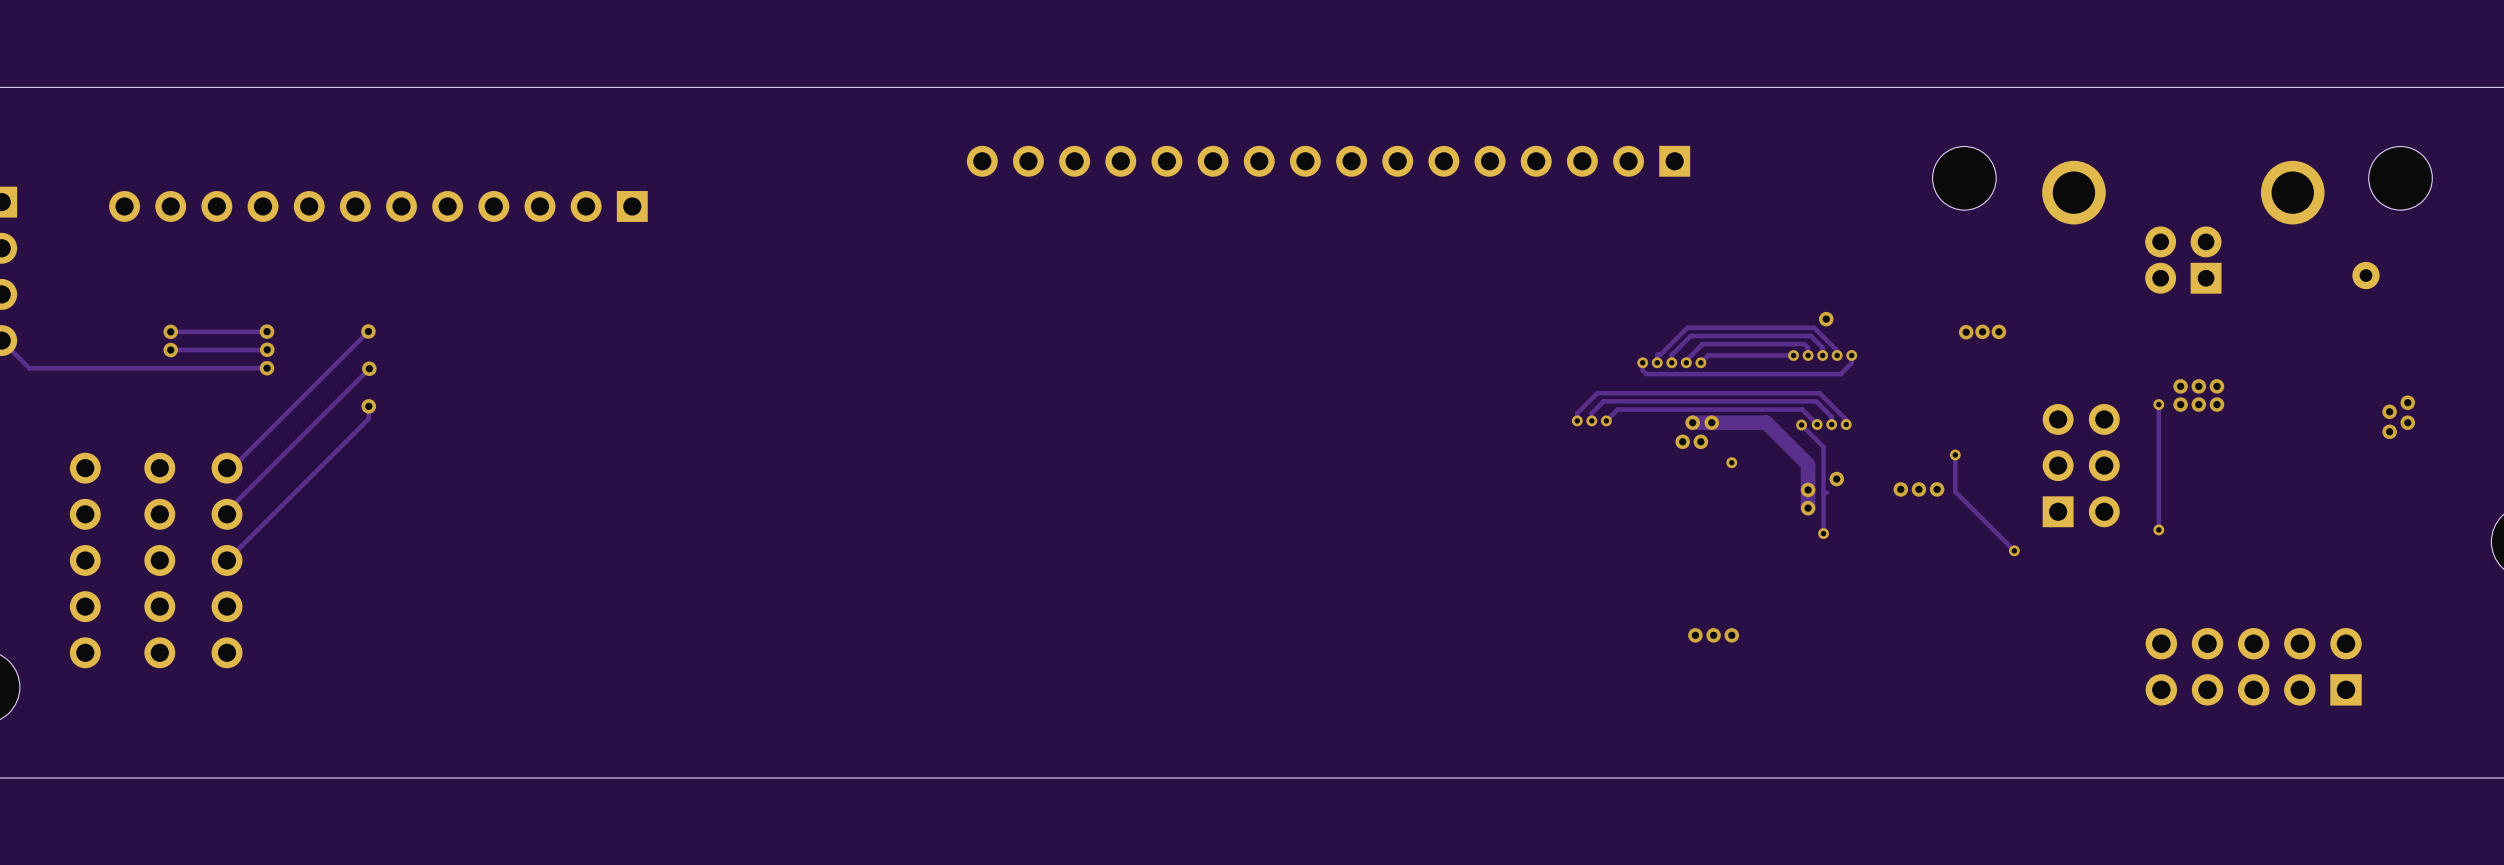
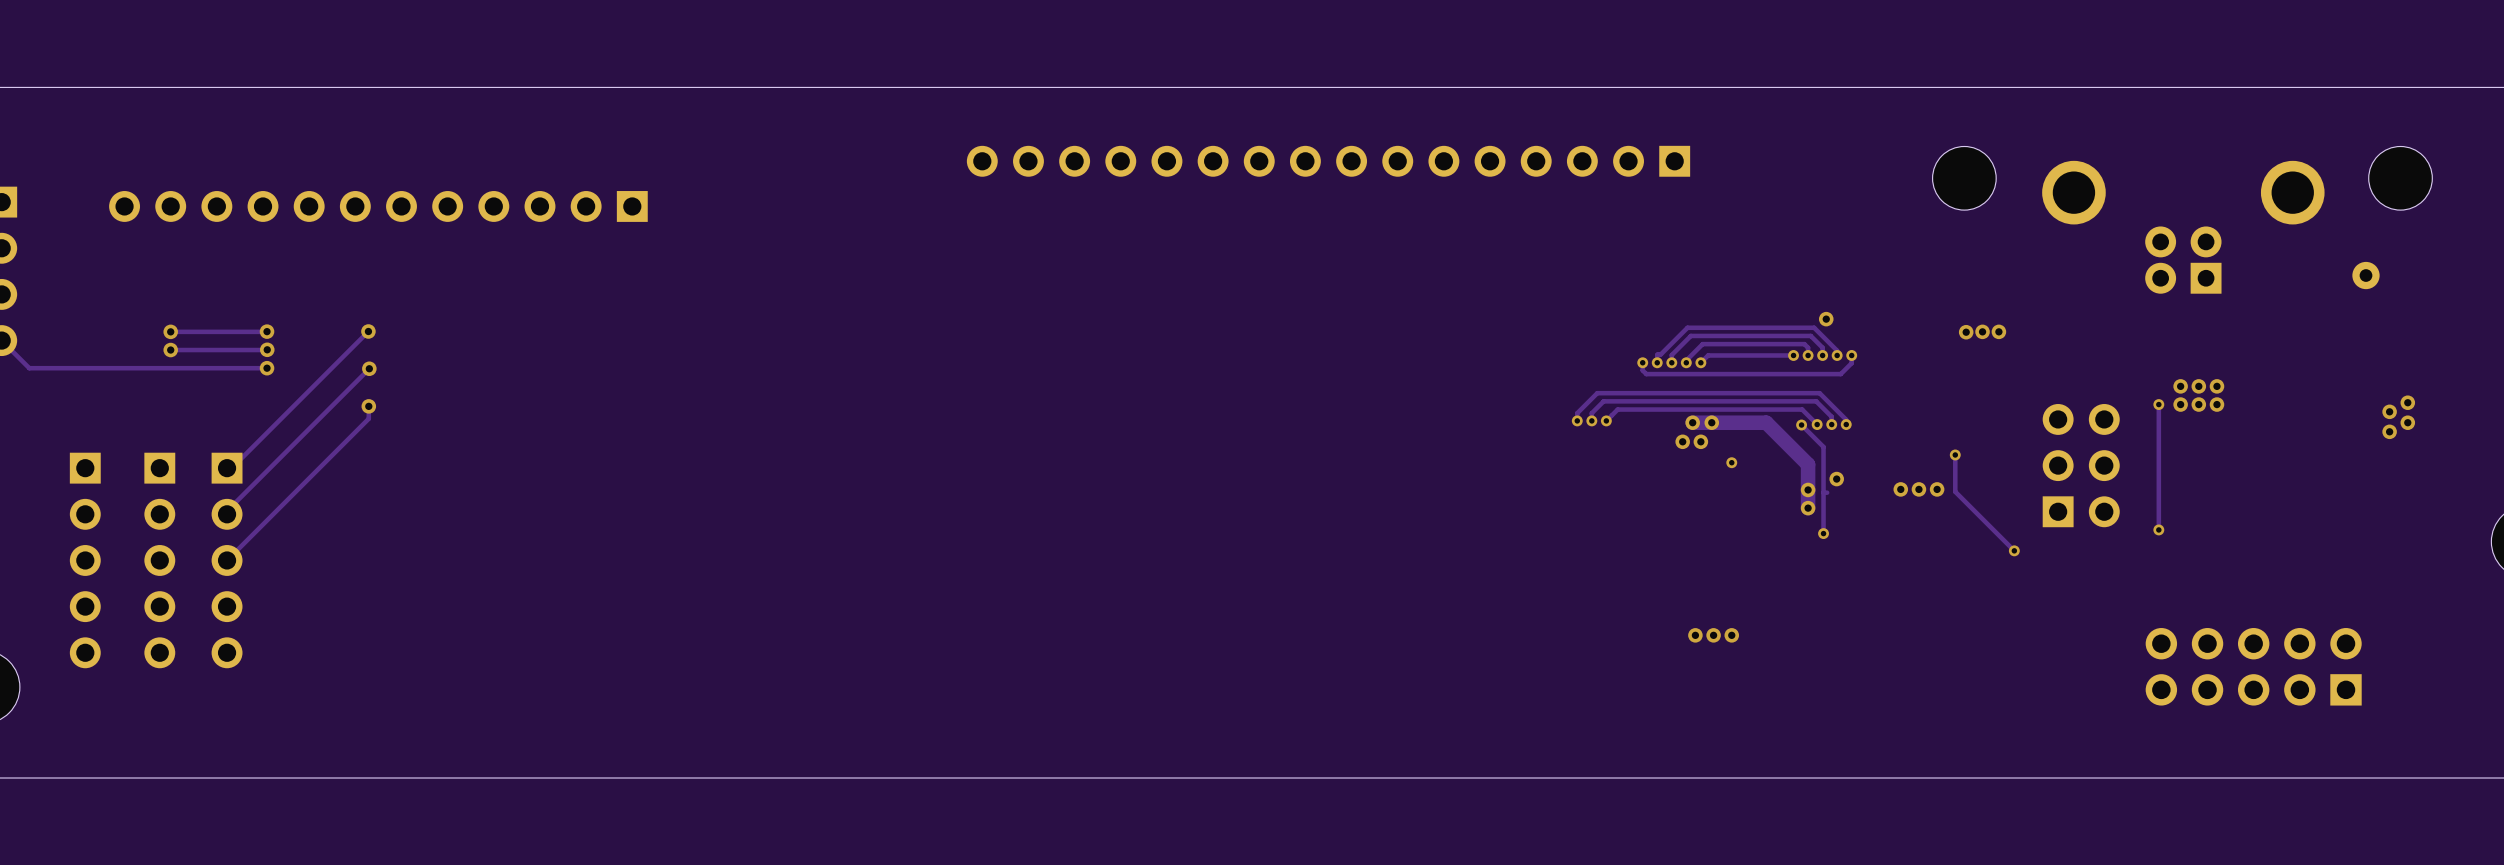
part footprint: [69, 452, 101, 669] -> [69, 452, 101, 669]
part footprint: [144, 452, 176, 669] -> [144, 452, 176, 669]
part footprint: [211, 452, 243, 669] -> [211, 452, 243, 669]

